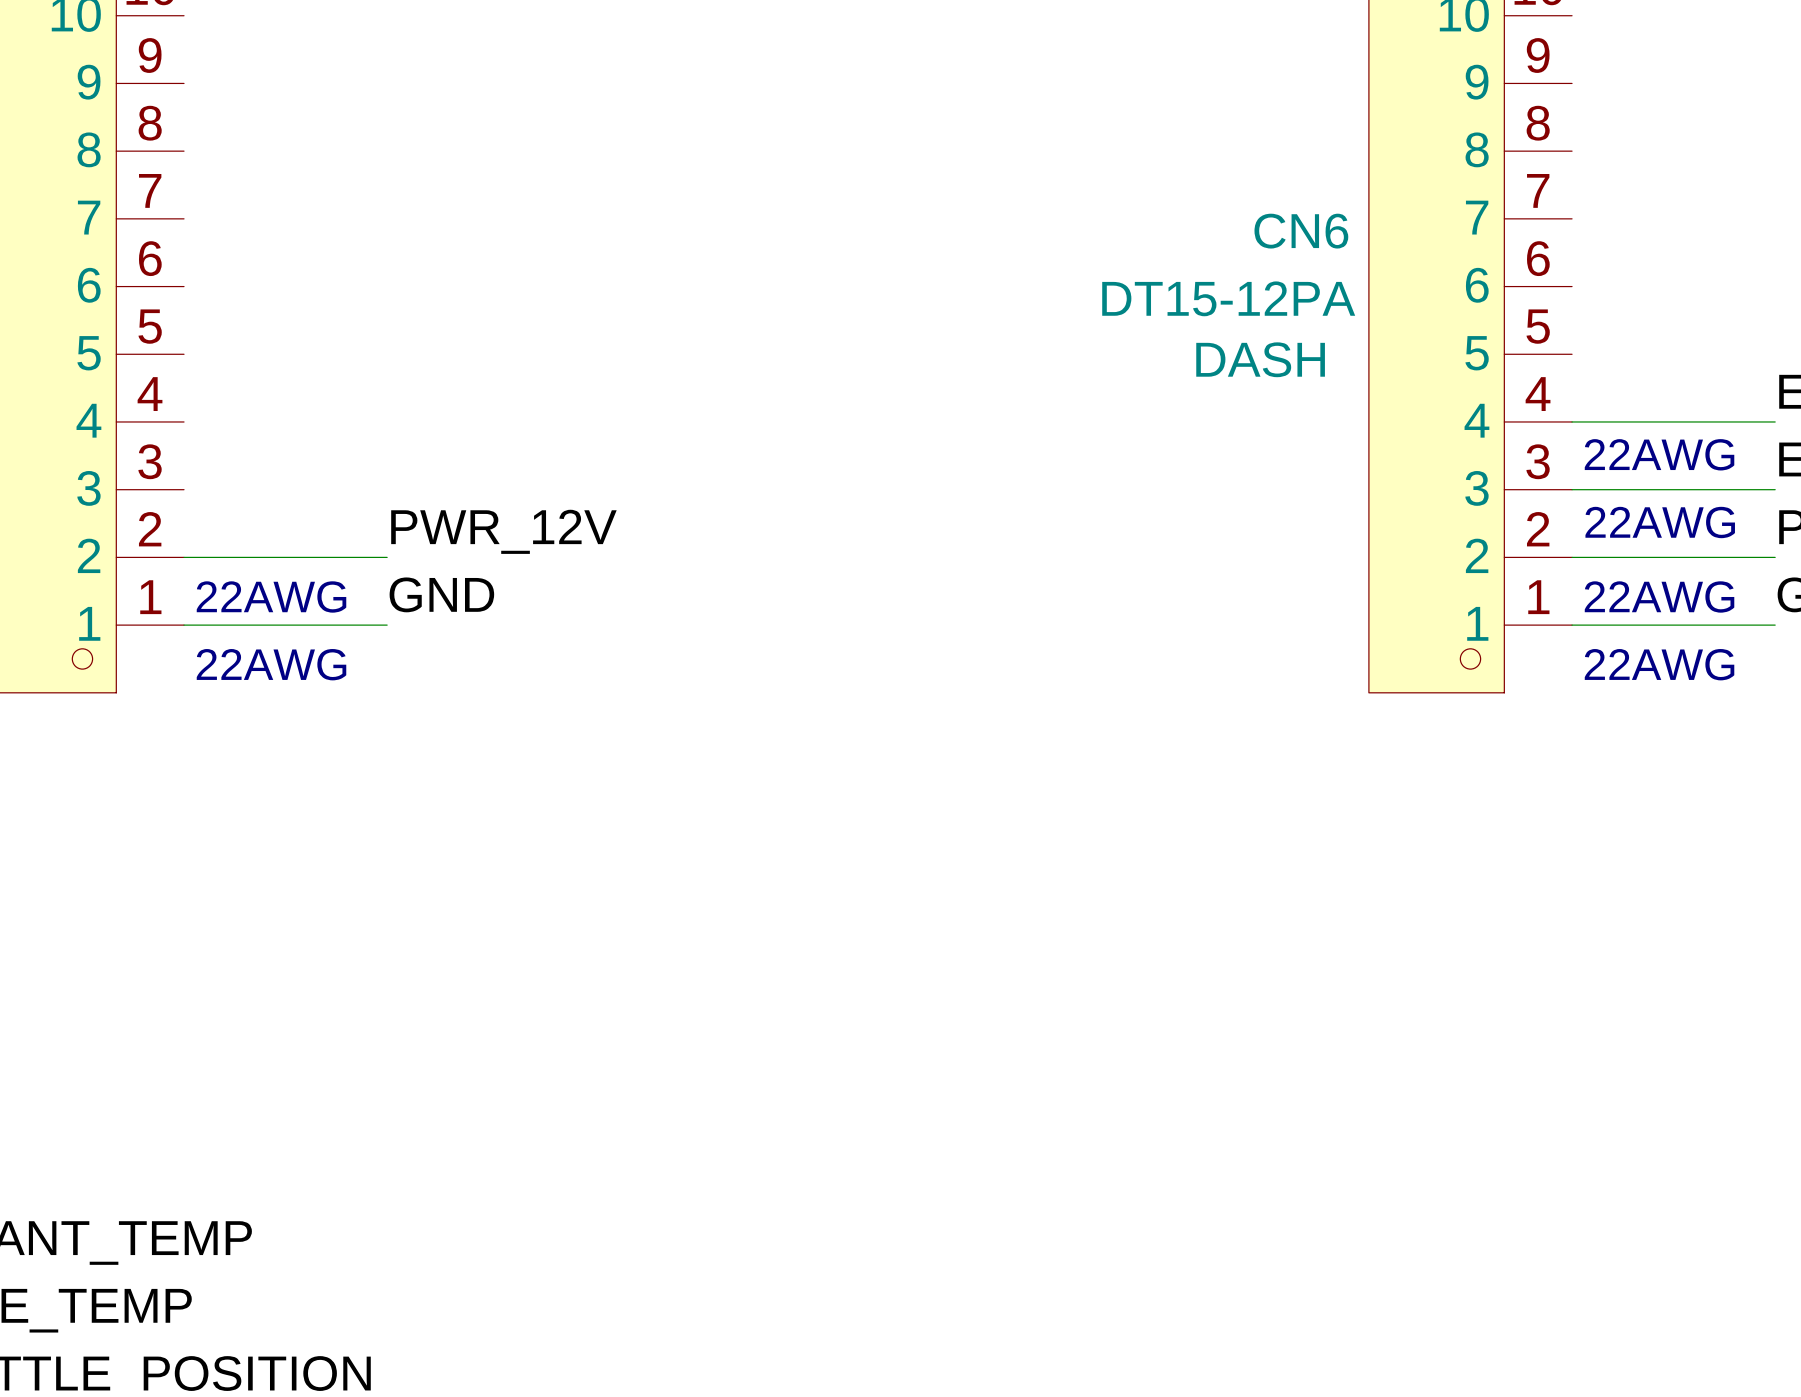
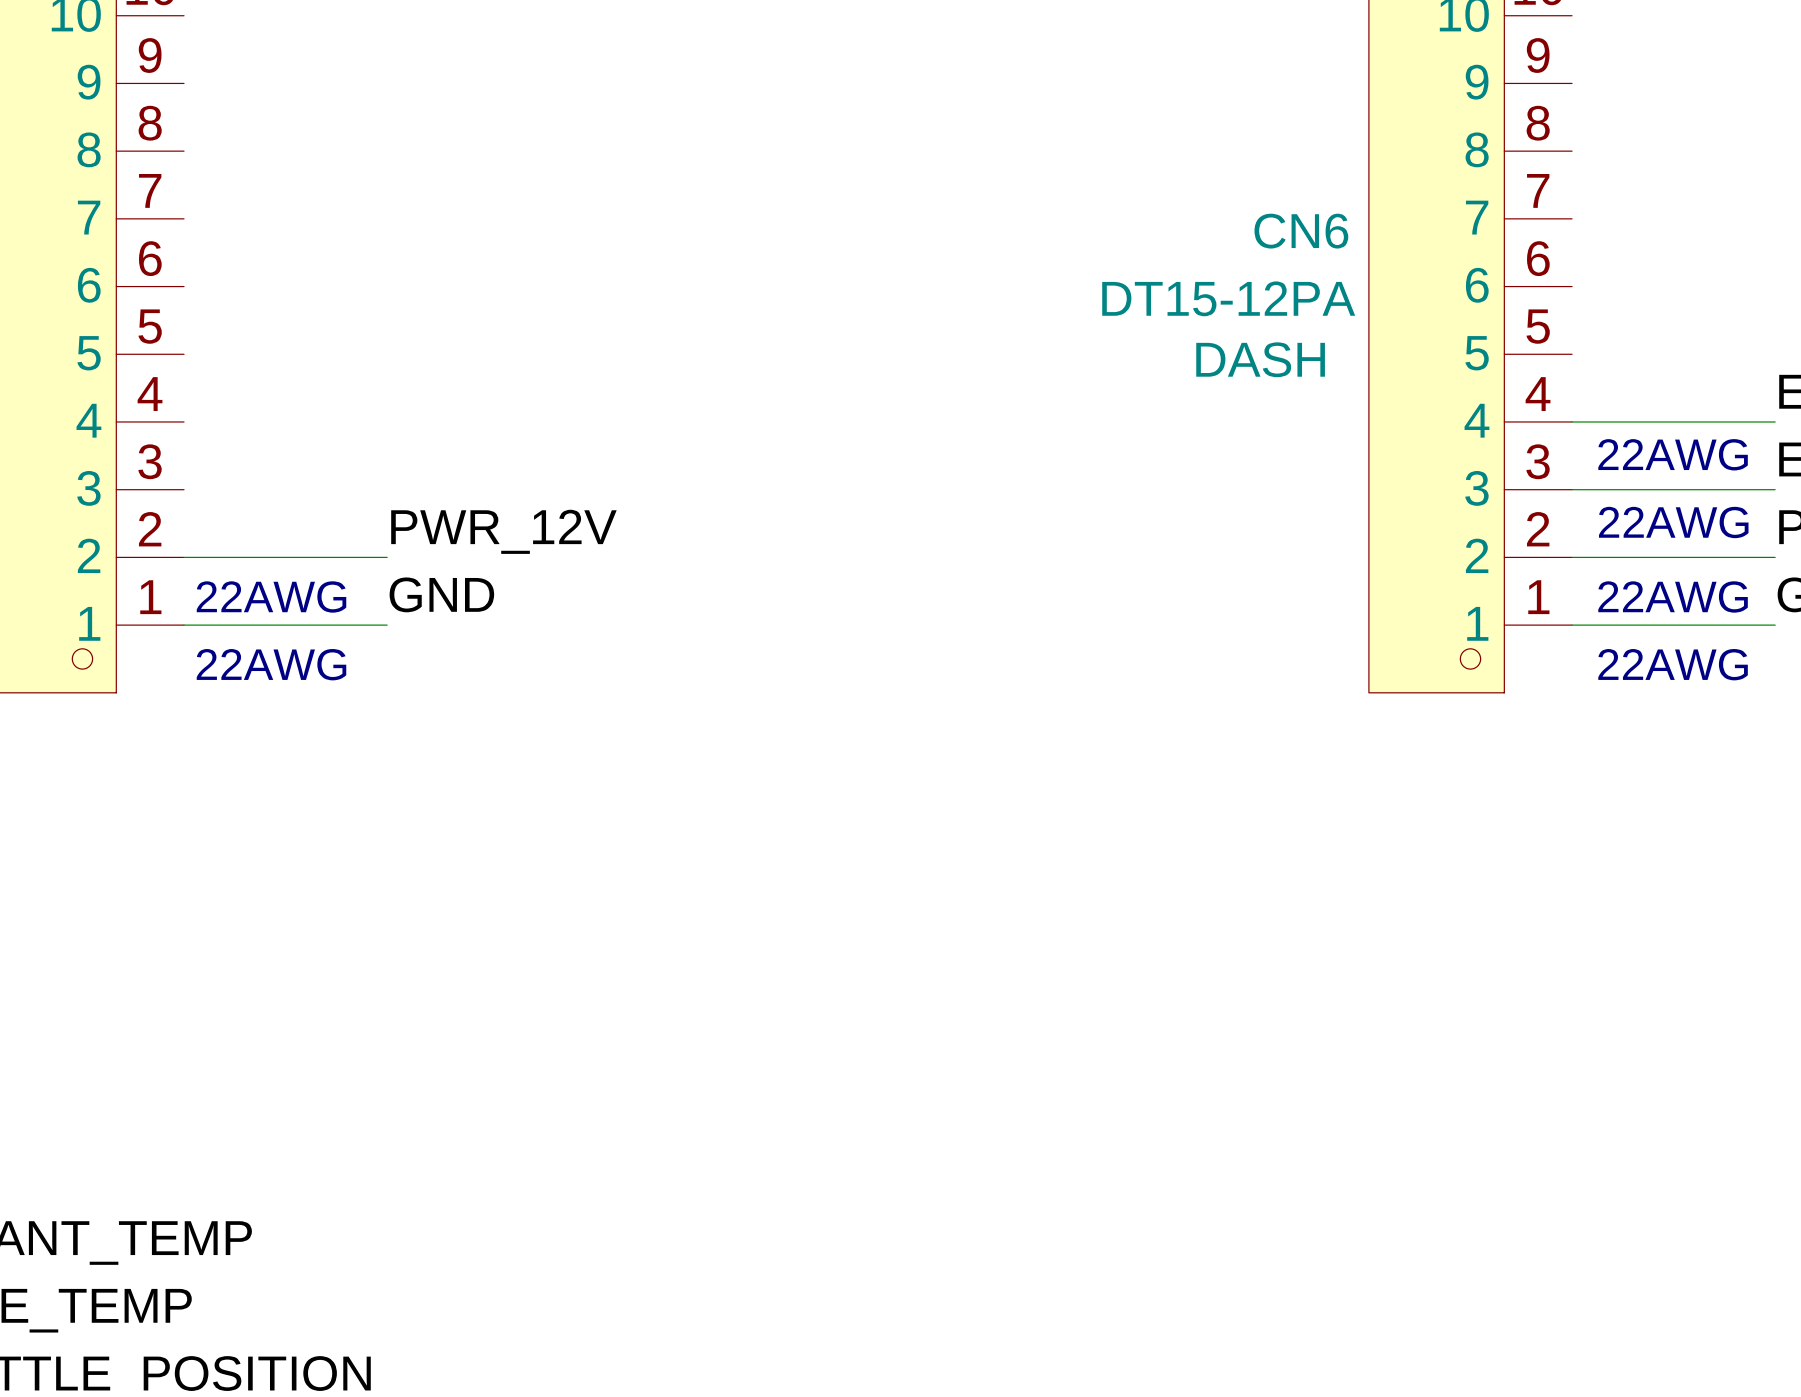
text position: 22AWG (1659, 454) -> 22AWG (1673, 454)
text position: 22AWG (1660, 522) -> 22AWG (1673, 522)
text position: 22AWG (1659, 596) -> 22AWG (1673, 596)
text position: 22AWG (1659, 664) -> 22AWG (1673, 664)

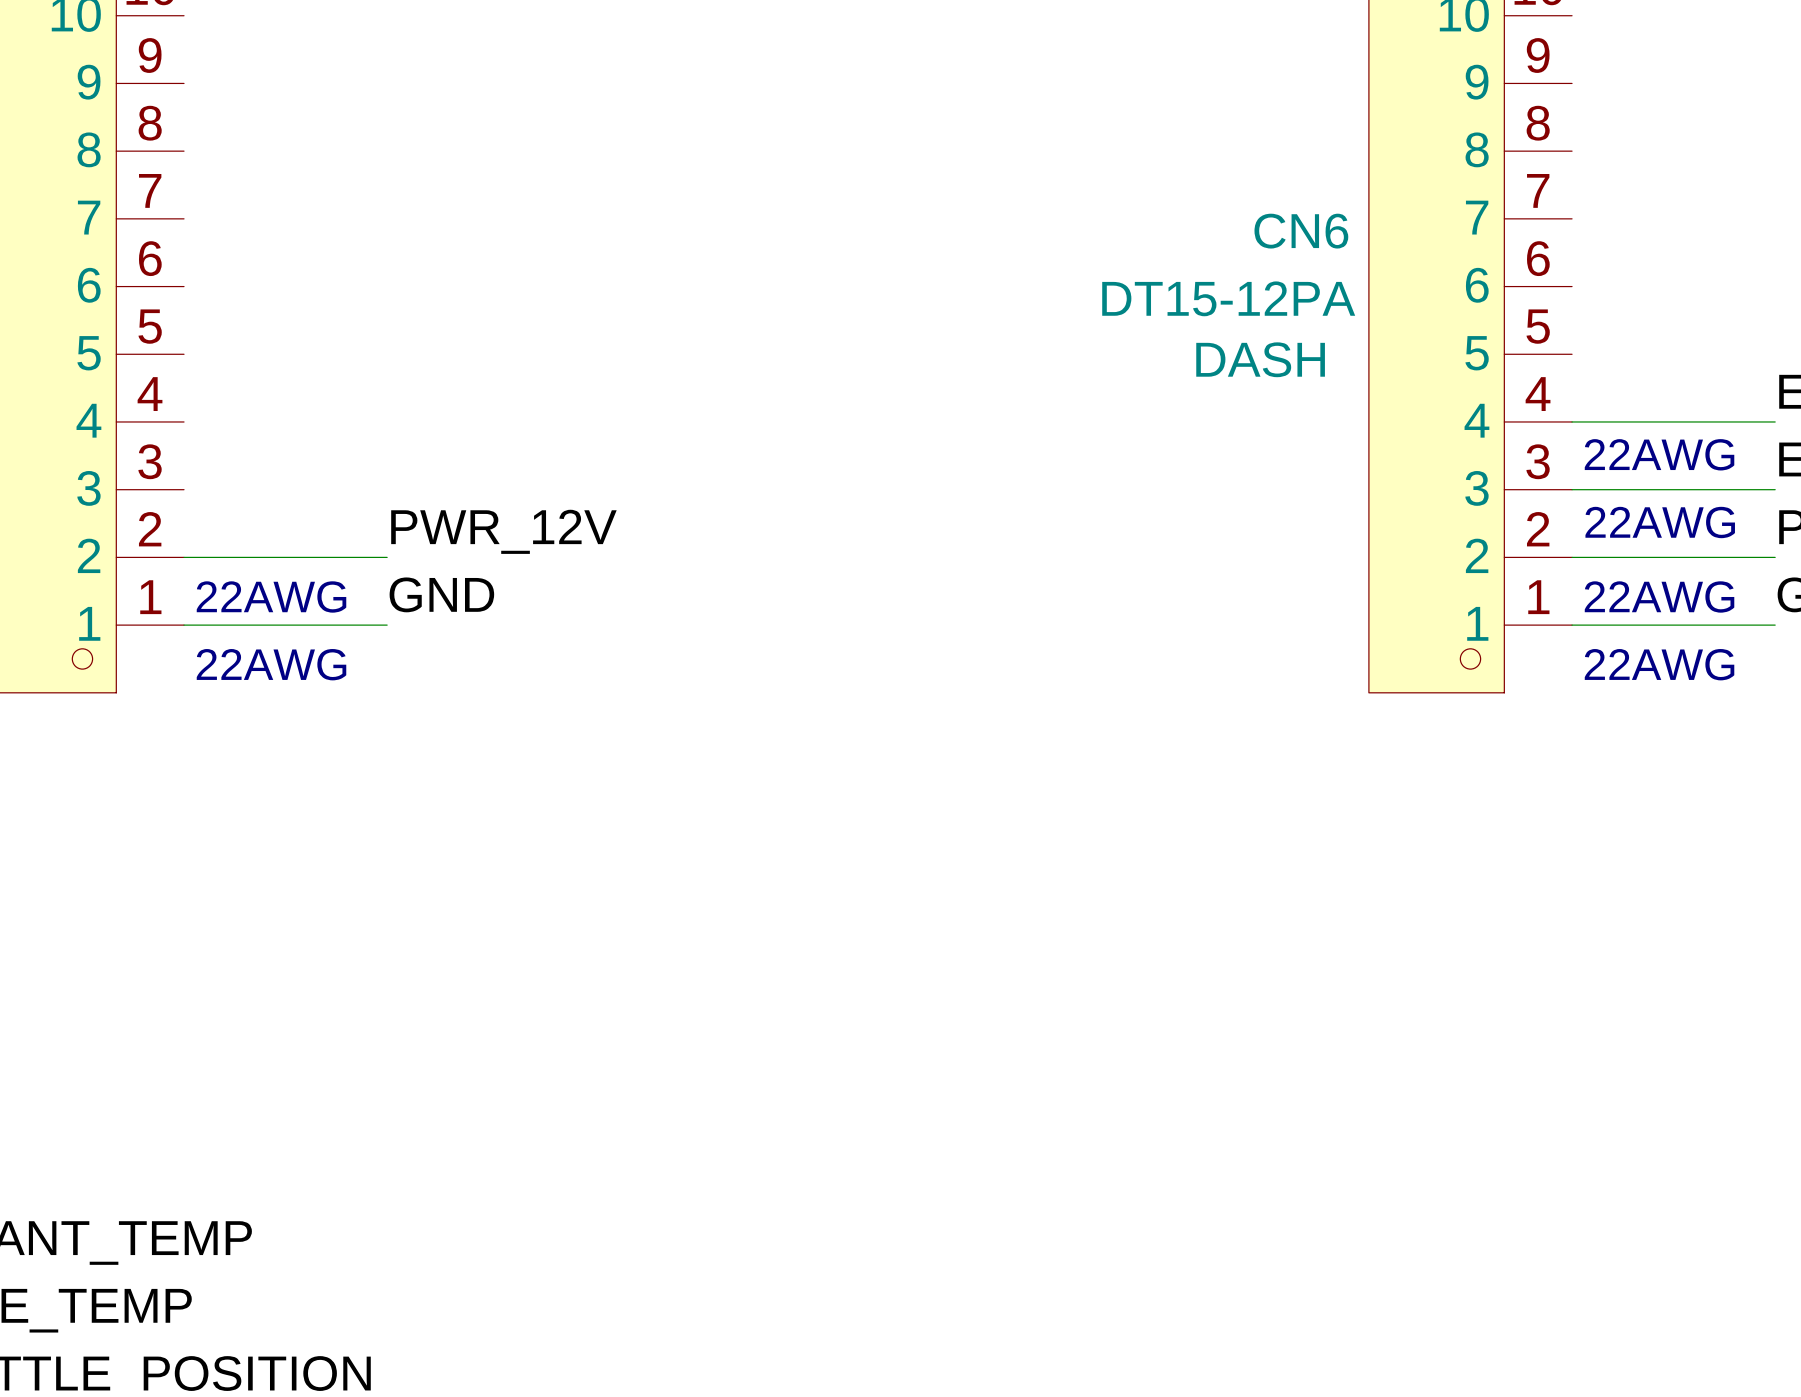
text position: 22AWG (1673, 454) -> 22AWG (1659, 454)
text position: 22AWG (1673, 522) -> 22AWG (1660, 522)
text position: 22AWG (1673, 596) -> 22AWG (1659, 596)
text position: 22AWG (1673, 664) -> 22AWG (1659, 664)

